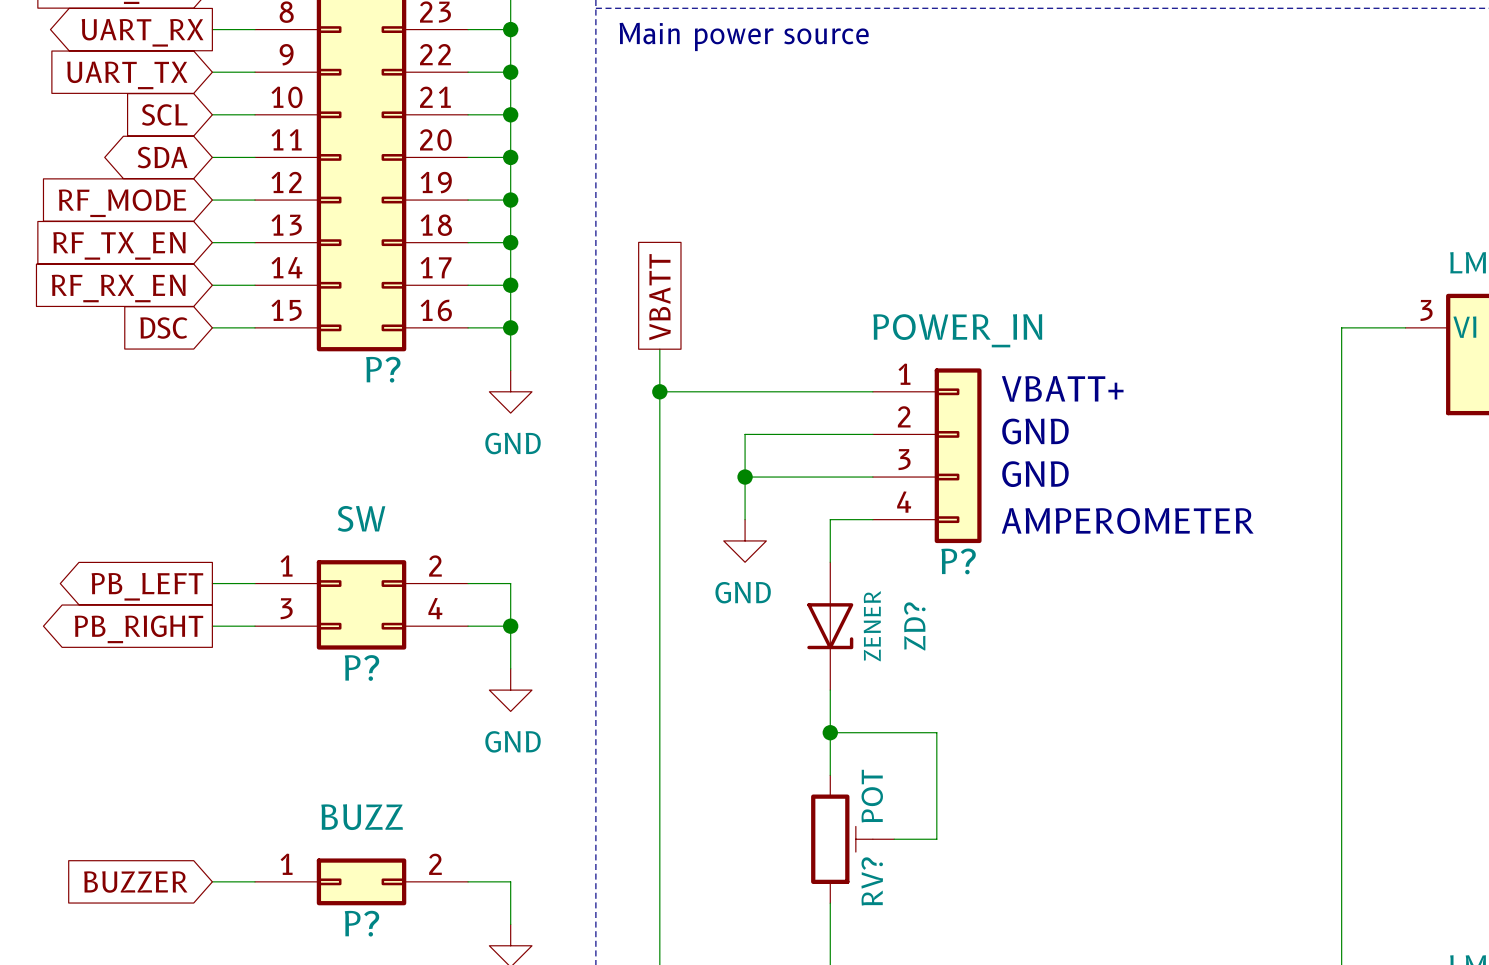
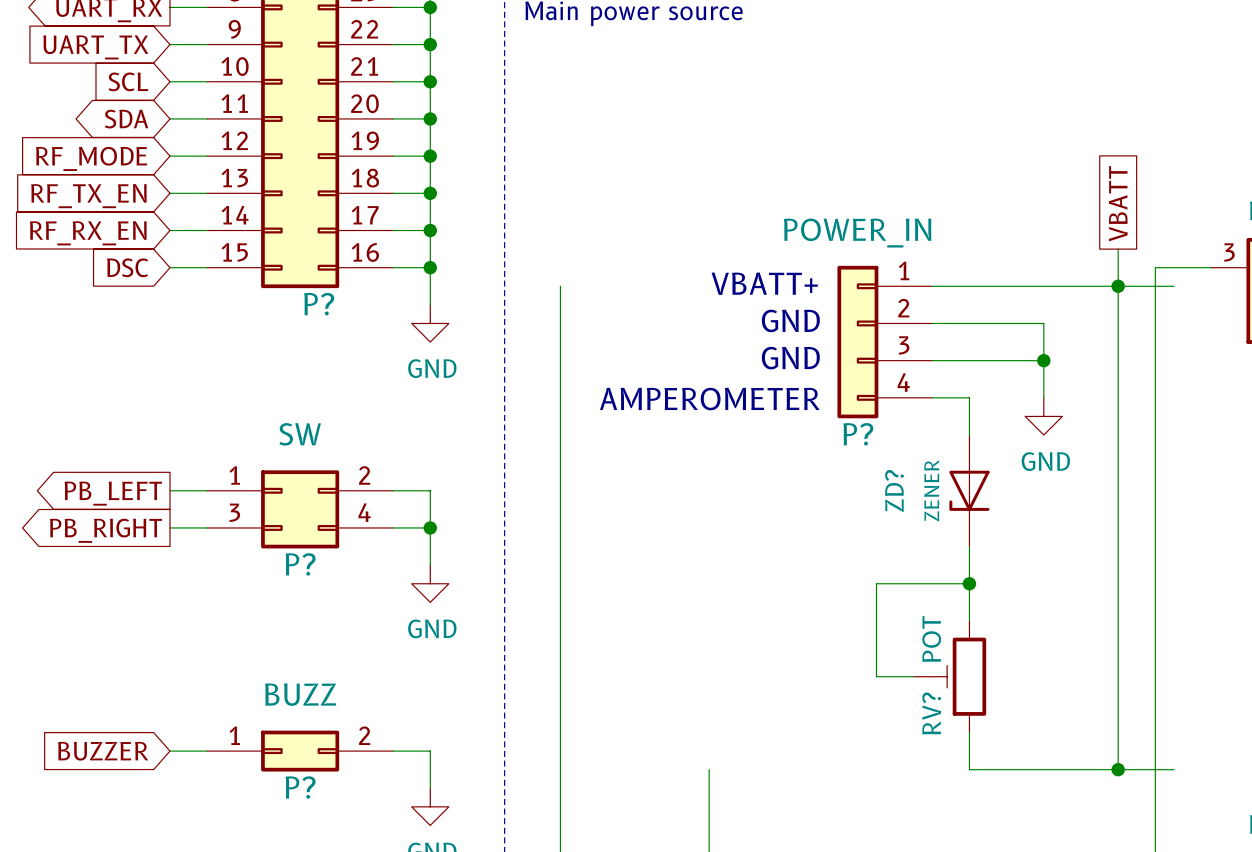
global label: none -> VBATT (1118, 203)
global label: VBATT (659, 297) -> none
wire: none -> (1118, 249) (1118, 769)
wire: none -> (932, 286) (1173, 286)
junction: none -> (1118, 286)
text: none -> GND (790, 320)
text position: VBATT+ (1062, 388) -> VBATT+ (764, 283)
wire: (659, 391) (872, 391) -> none
junction: (659, 391) -> none
wire: none -> (932, 323) (1043, 323) (1043, 397)
P?: none -> POWER_IN (884, 342)
text: none -> GND (790, 358)
text: GND (1035, 431) -> none
wire: (872, 434) (745, 434) (745, 519) -> none
junction: none -> (1043, 360)
P?: POWER_IN (927, 455) -> none
text: GND (1035, 474) -> none
wire: (745, 477) (872, 477) -> (932, 360) (1043, 360)
junction: (745, 477) -> none
wire: none -> (932, 397) (969, 397) (969, 435)
power symbol: none -> GND (1043, 416)
wire: (872, 519) (830, 519) (830, 562) -> none
text position: AMPEROMETER (1127, 520) -> AMPEROMETER (709, 399)
power symbol: GND (745, 540) -> none
ZD?: none -> ZENER (969, 490)
ZD?: ZENER (830, 626) -> none
wire: (830, 690) (830, 775) -> (969, 546) (969, 620)
wire: none -> (969, 583) (876, 583) (876, 676) (913, 676)
junction: none -> (969, 583)
wire: (830, 732) (936, 732) (936, 839) (894, 839) -> none
junction: (830, 732) -> none
RV? value position: POT (872, 796) -> POT (931, 639)
RV? rotation: 0° (842, 839) -> 180° (959, 676)
RV? position: (852, 839) -> (949, 676)
wire: none -> (969, 732) (969, 769) (1173, 769)
RV? name position: RV? (872, 881) -> RV? (931, 713)
junction: none -> (1118, 769)

